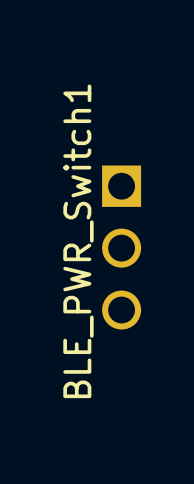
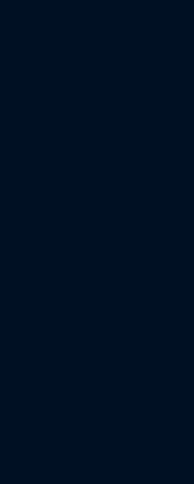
BLE_PWR_Switch1: (121, 247) -> none

